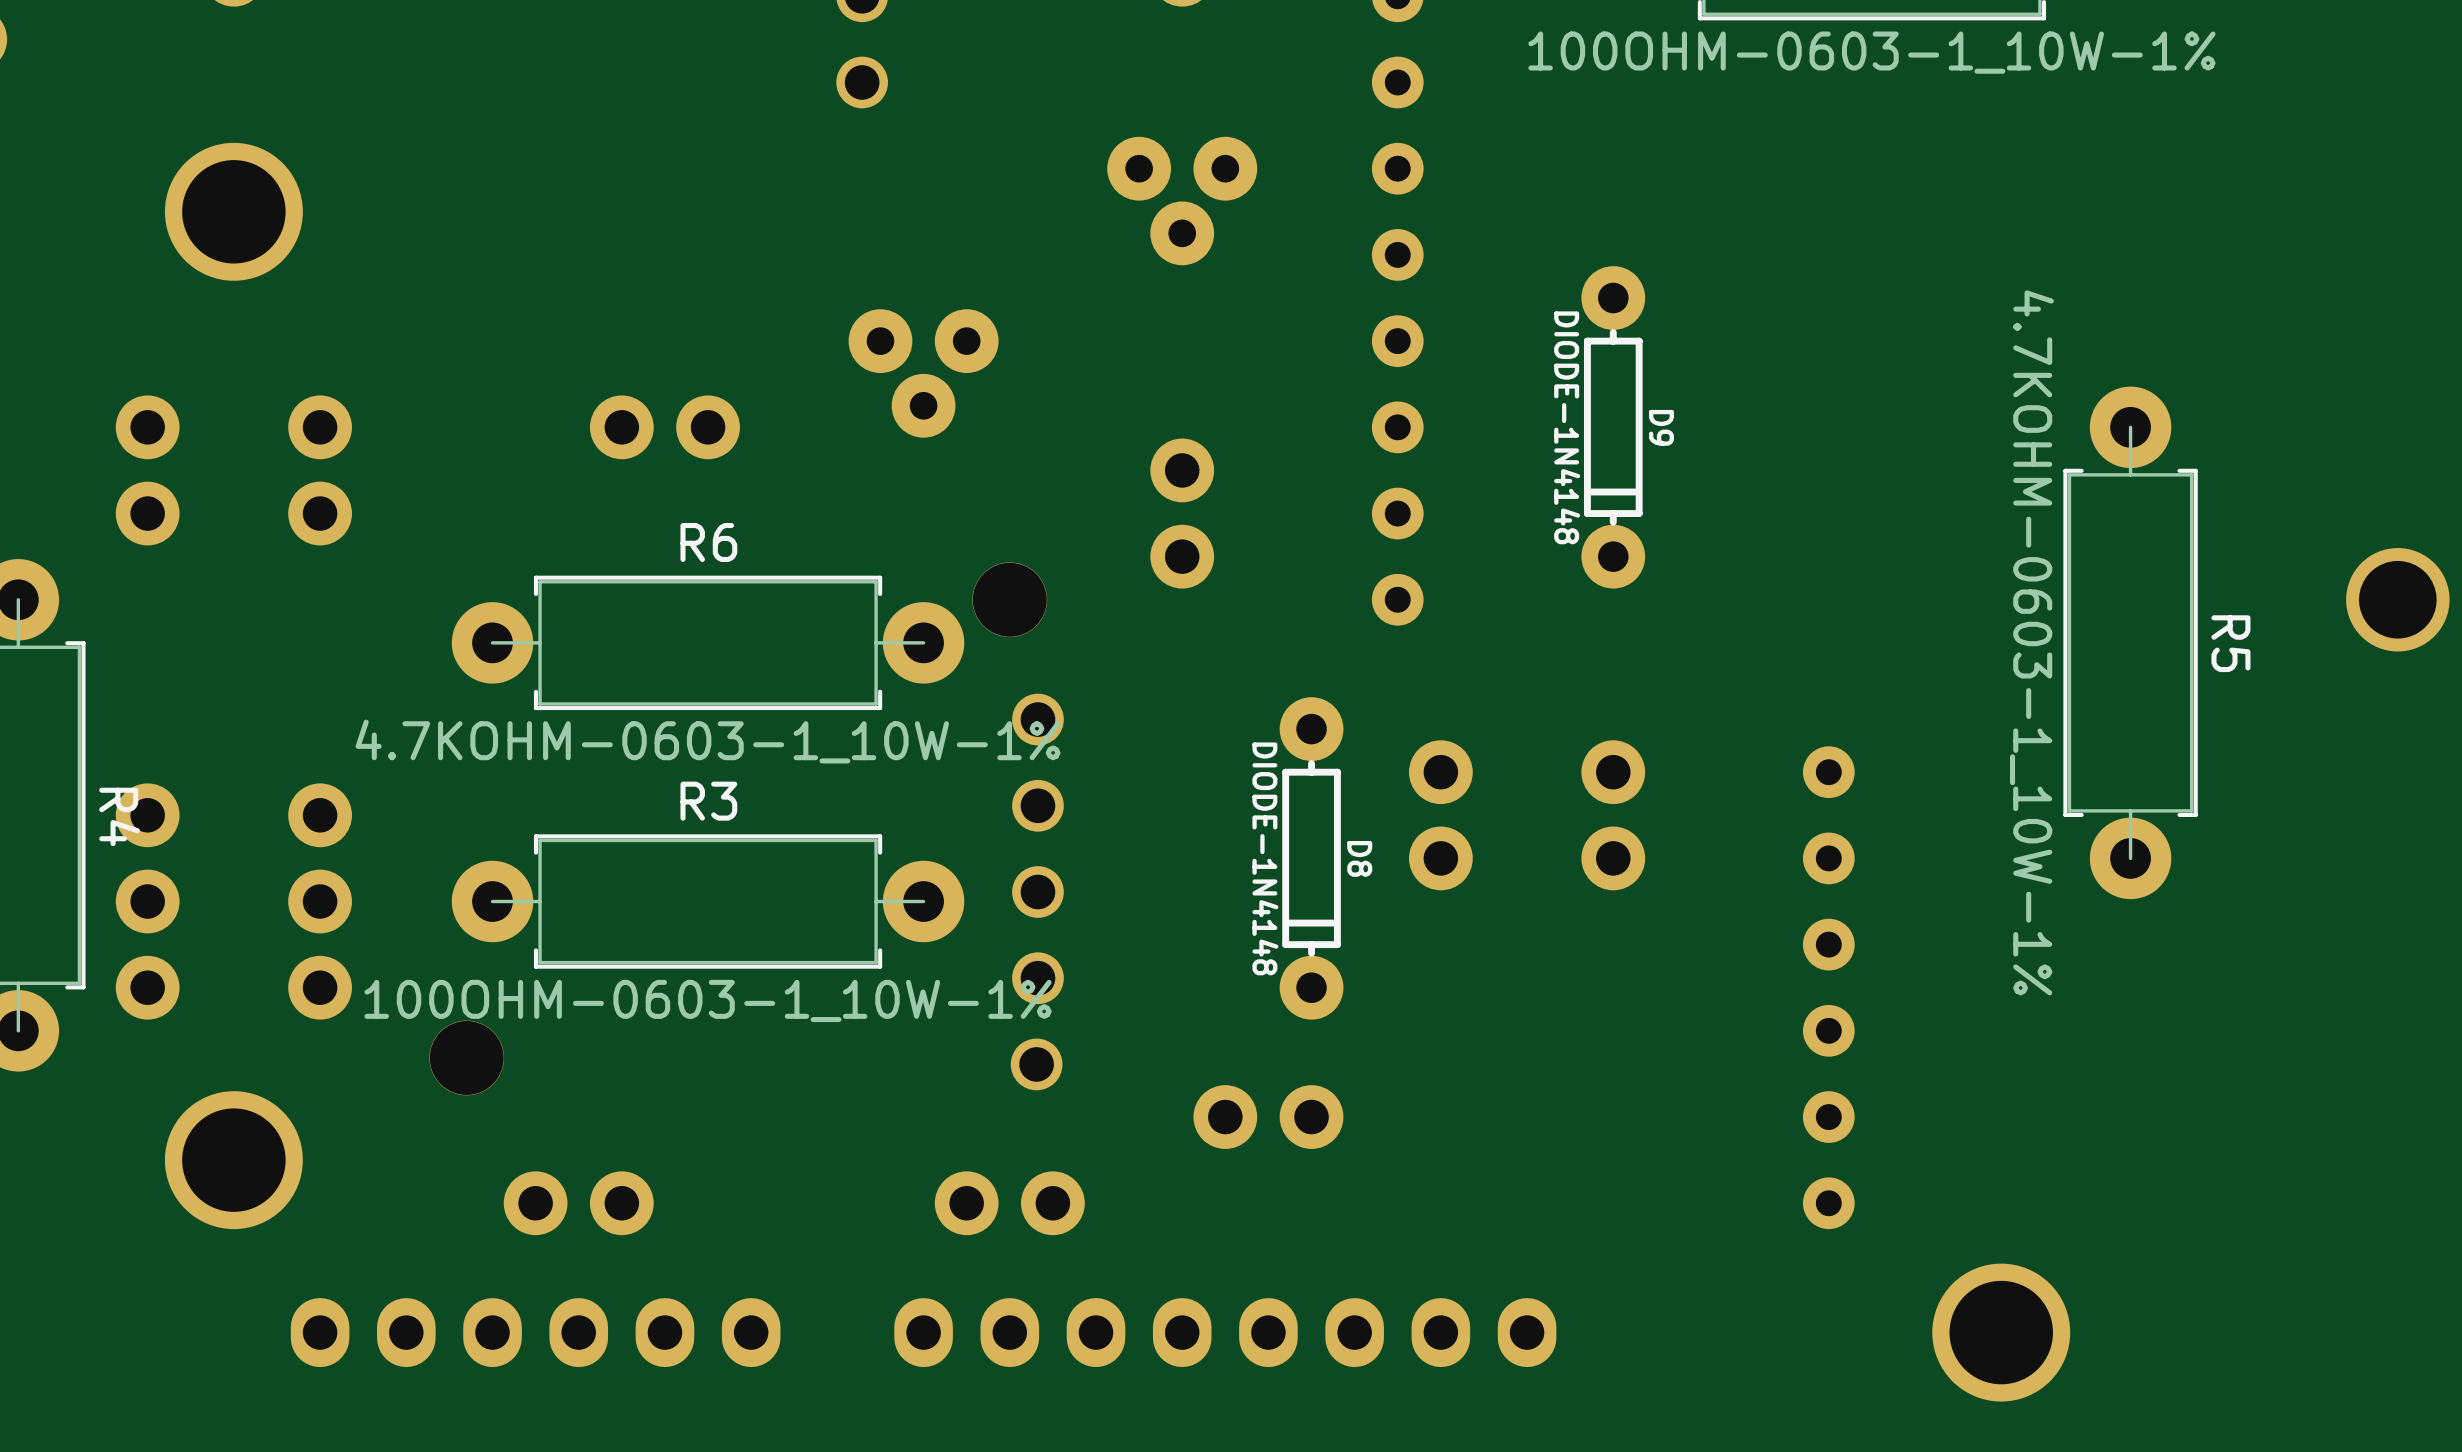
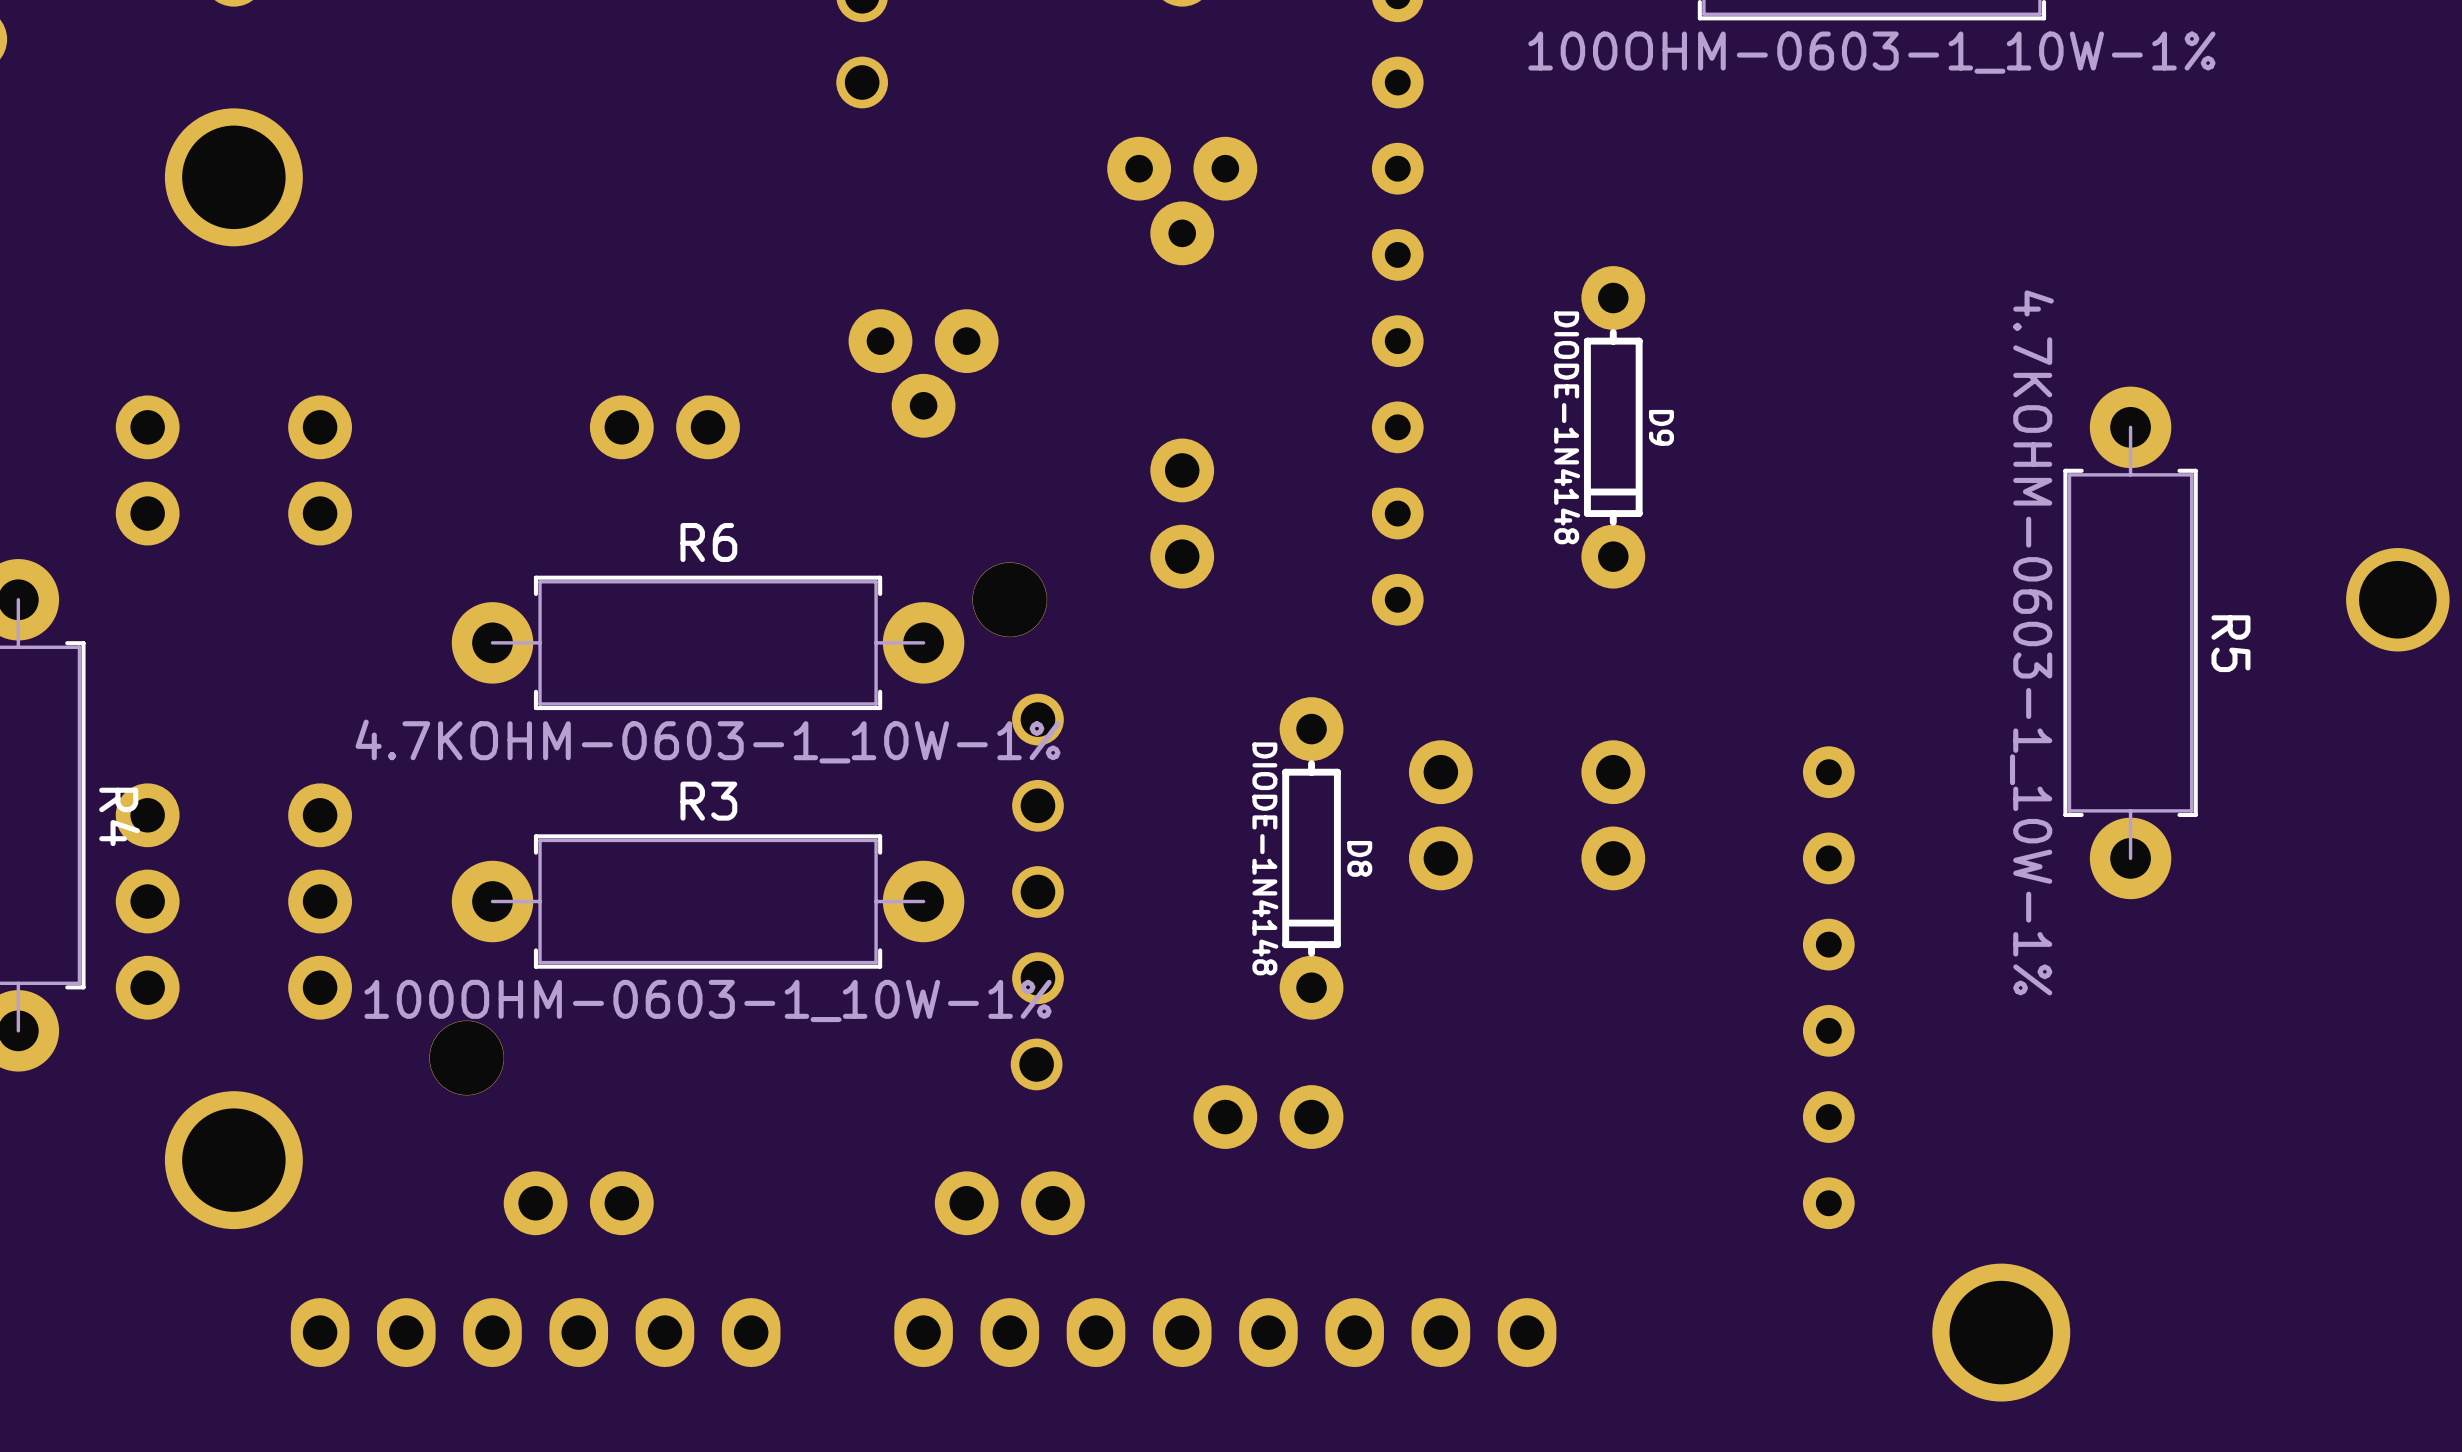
part position: (233, 211) -> (233, 177)

